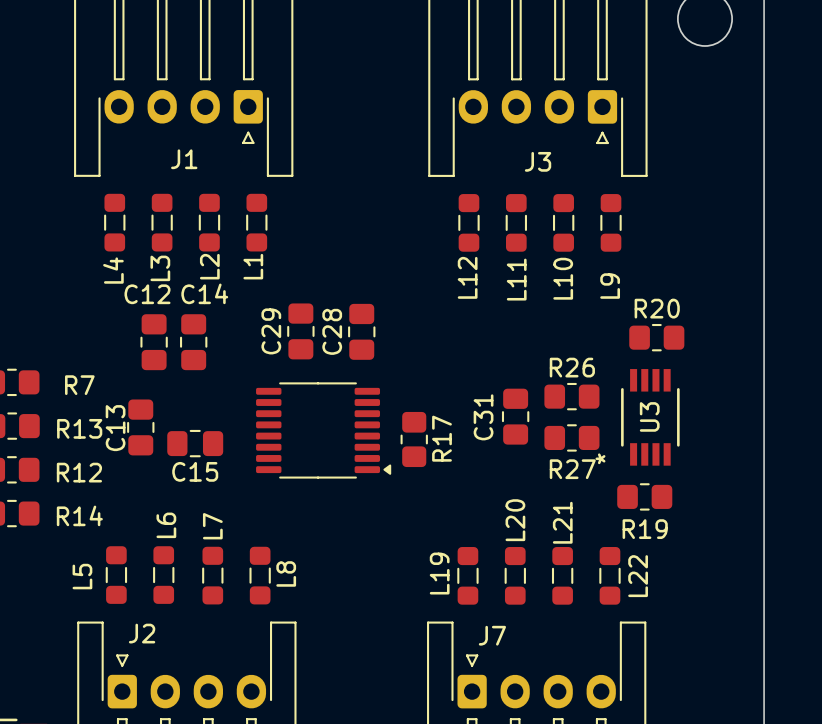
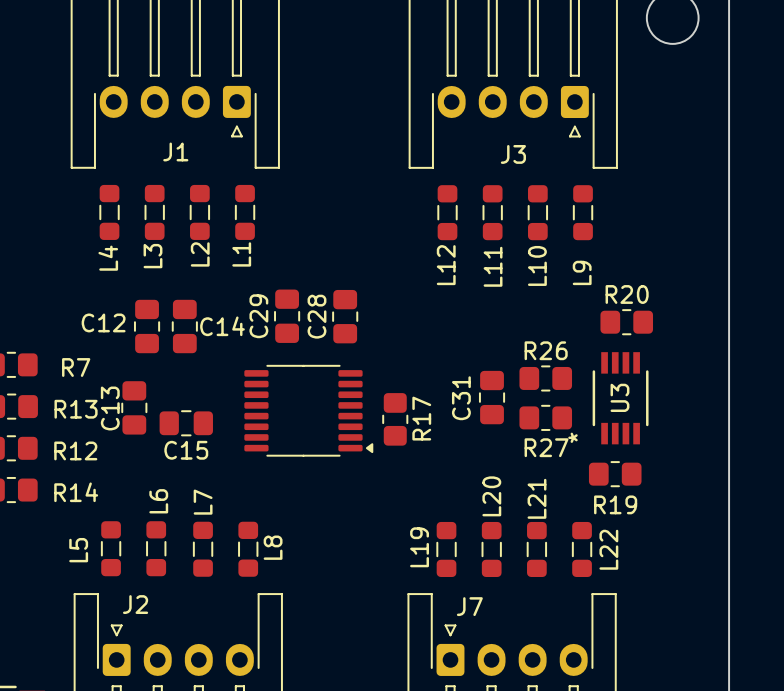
C14 name position: C14 (204, 293) -> C14 (222, 326)
C12 name position: C12 (147, 294) -> C12 (103, 322)

